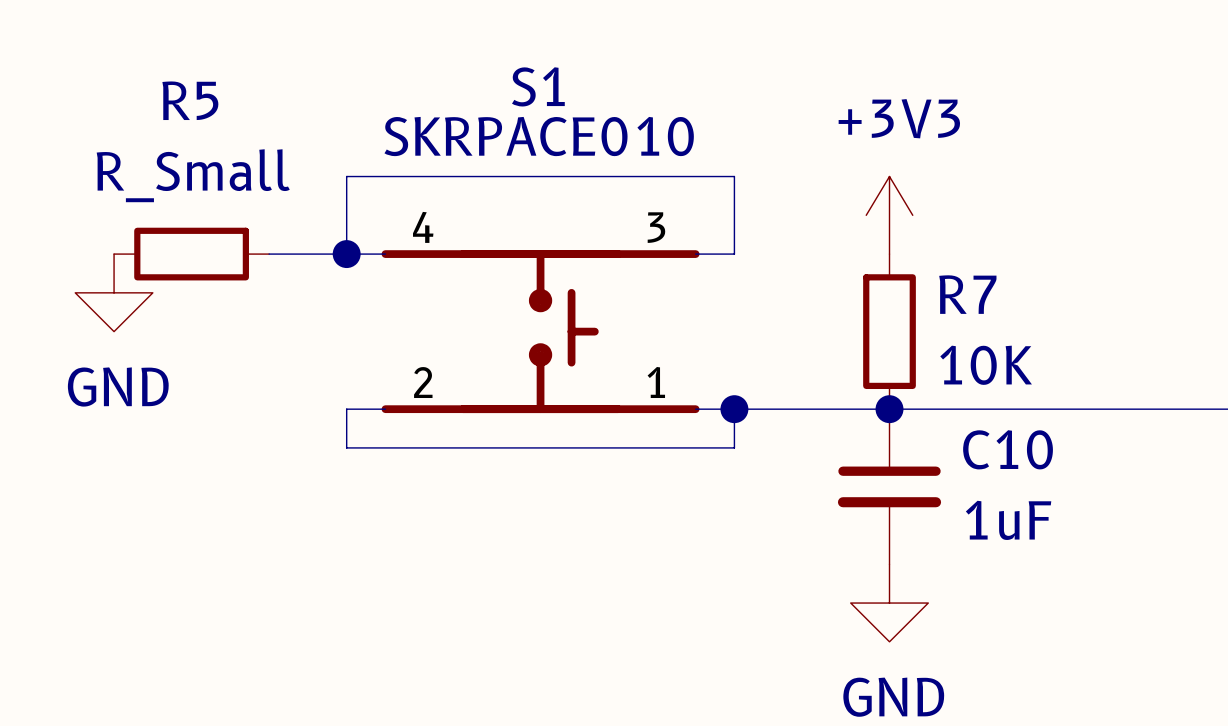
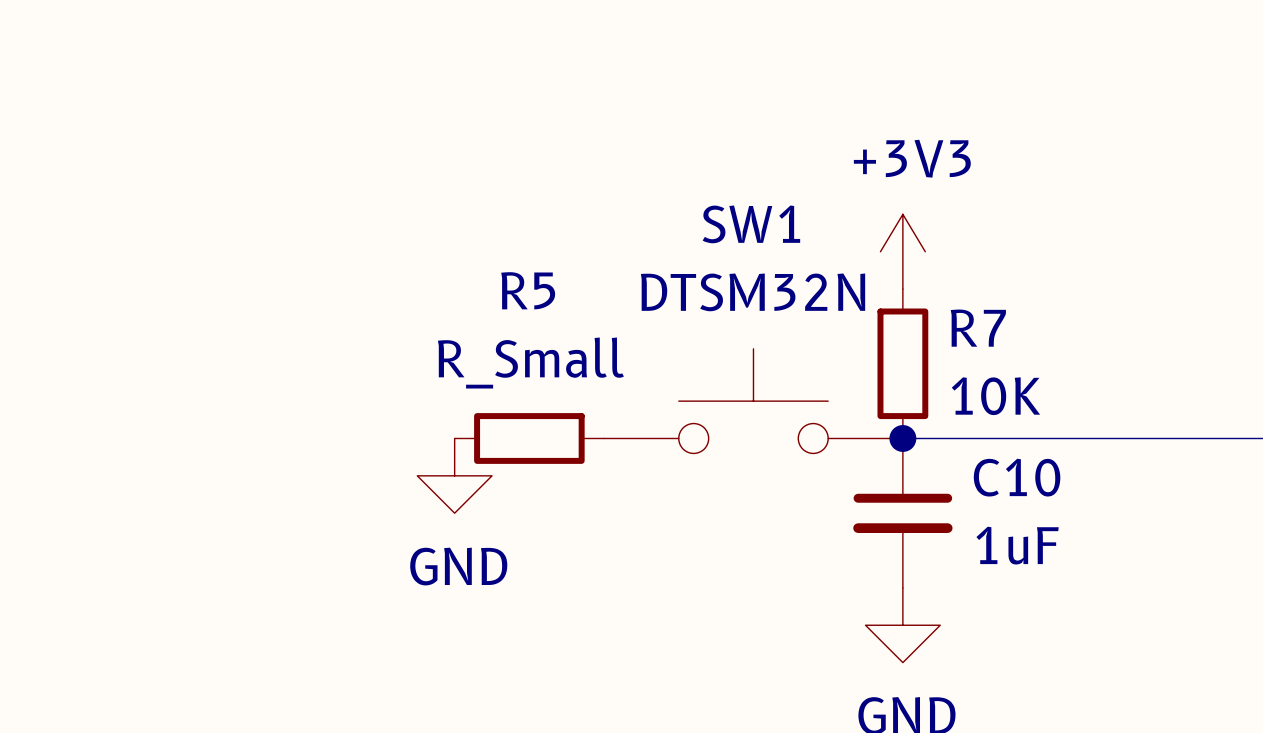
R5 position: (191, 254) -> (529, 438)
wire: (269, 254) (385, 254) -> none
wire: (346, 254) (346, 176) (734, 176) (734, 254) (695, 254) -> none
junction: (346, 254) -> none
power symbol position: GND (114, 292) -> GND (454, 475)
S1: SKRPACE010 (540, 331) -> none
SW1: none -> DTSM32N (753, 401)
wire: (385, 409) (346, 409) (346, 447) (734, 447) (734, 409) -> none
wire: (695, 409) (889, 409) -> none
junction: (734, 409) -> none

